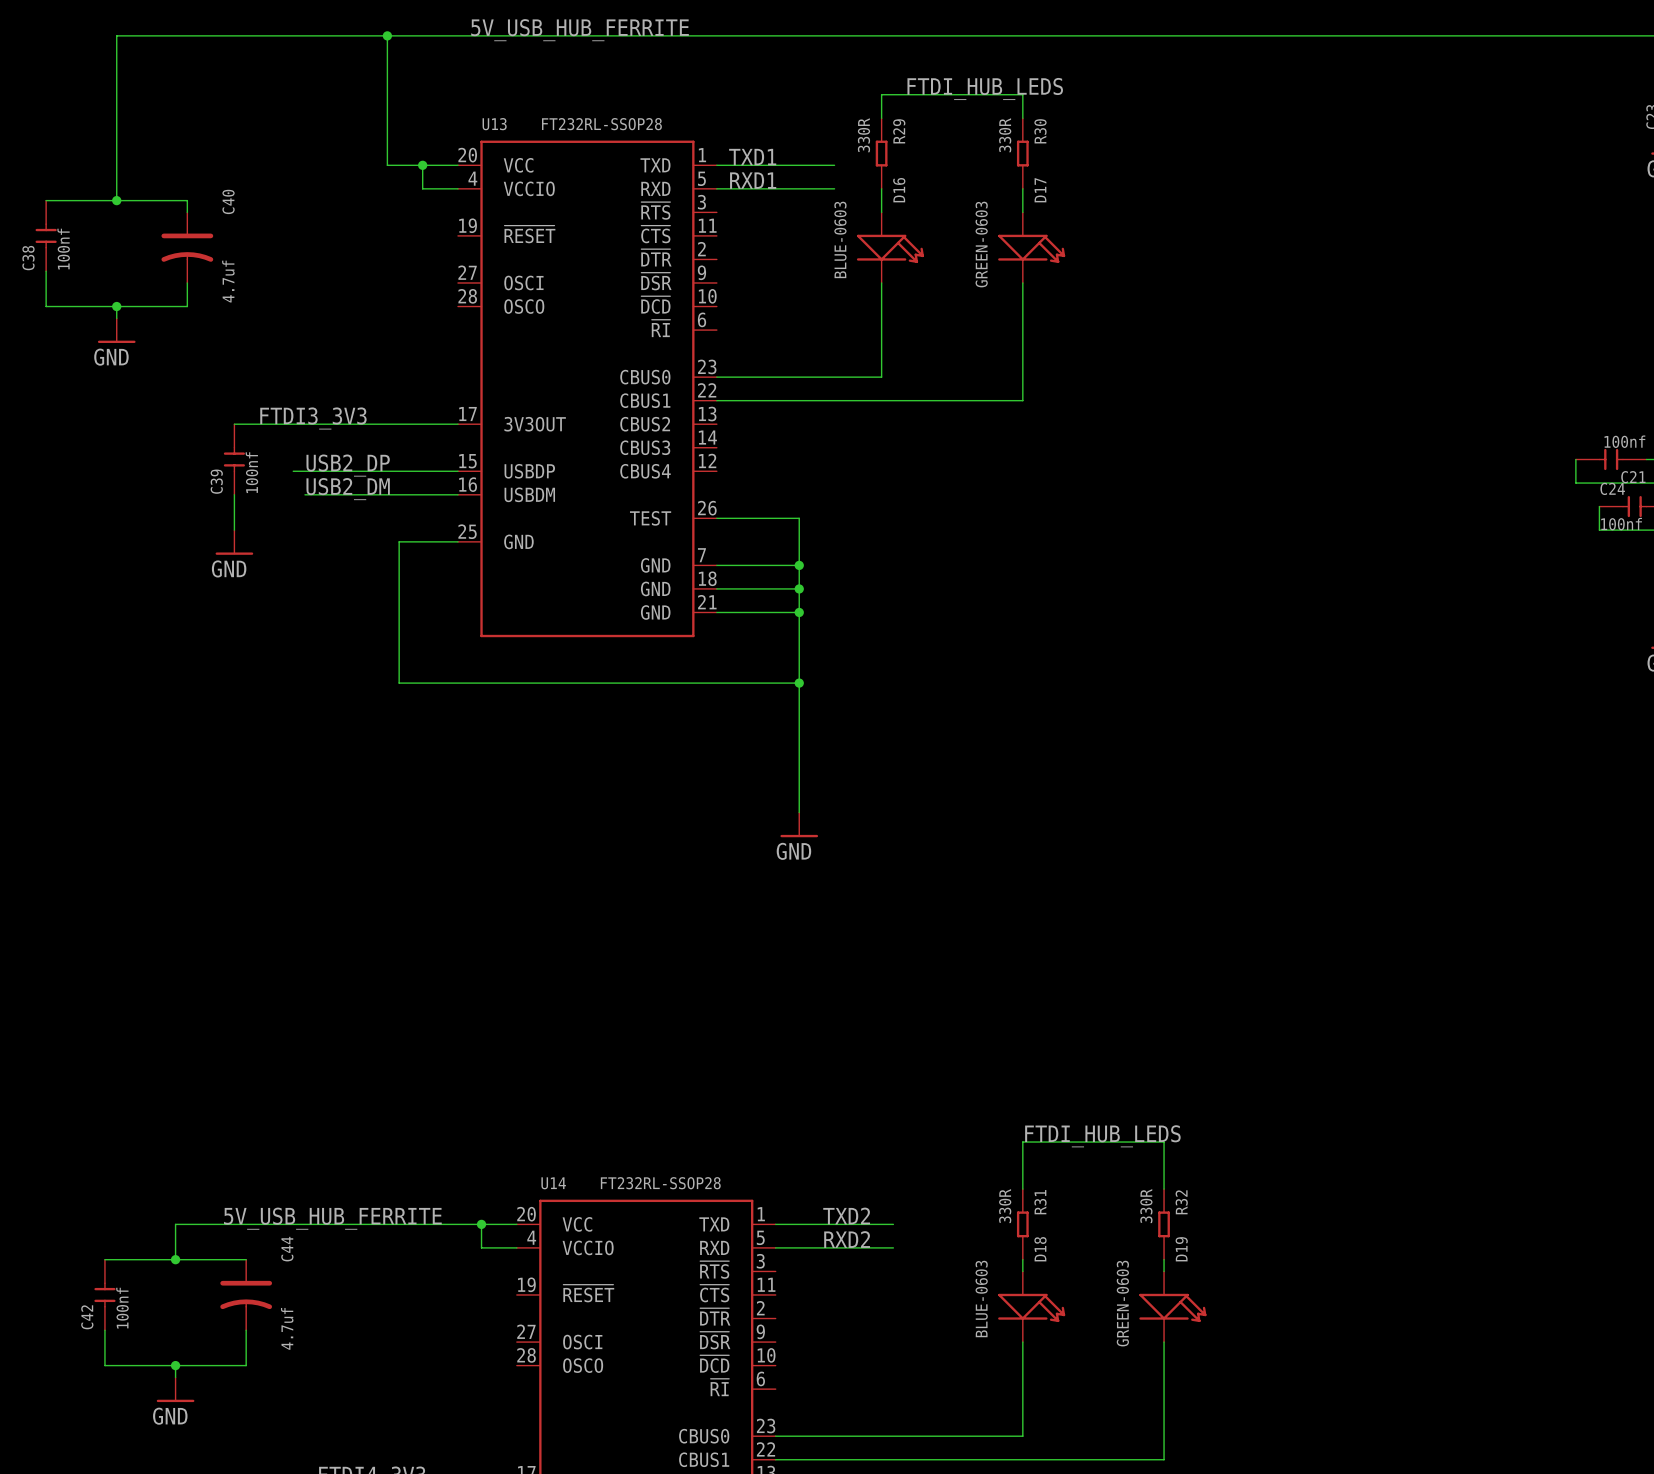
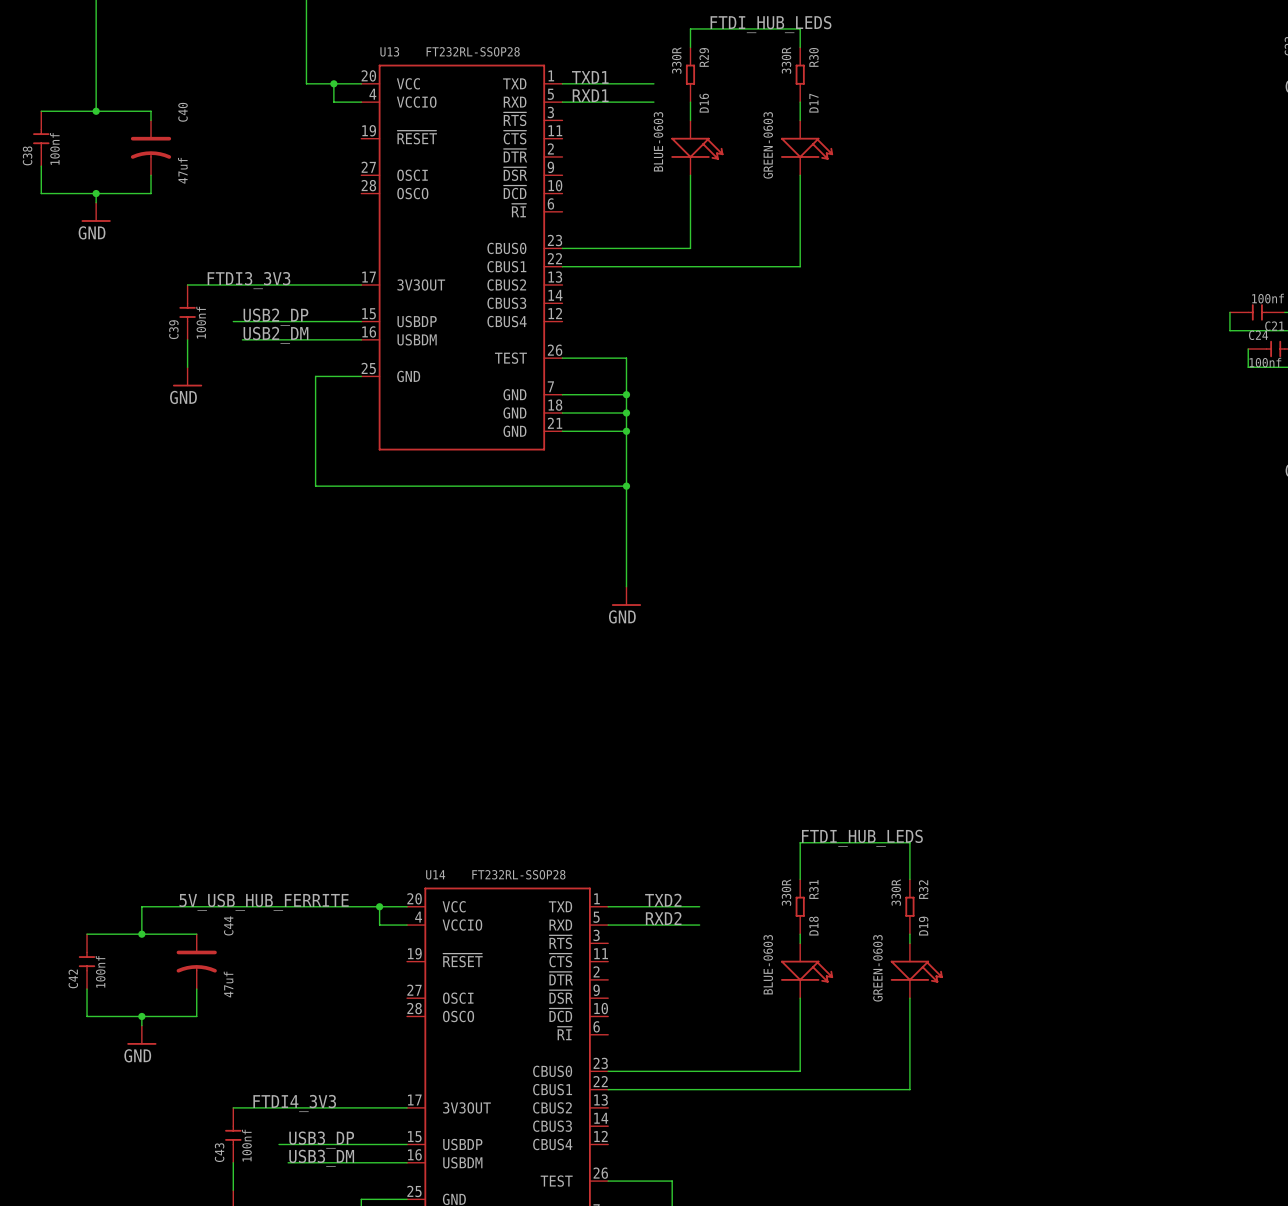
C40 value: 4.7uf (228, 281) -> 47uf (182, 170)
C44 value: 4.7uf (287, 1328) -> 47uf (228, 984)

